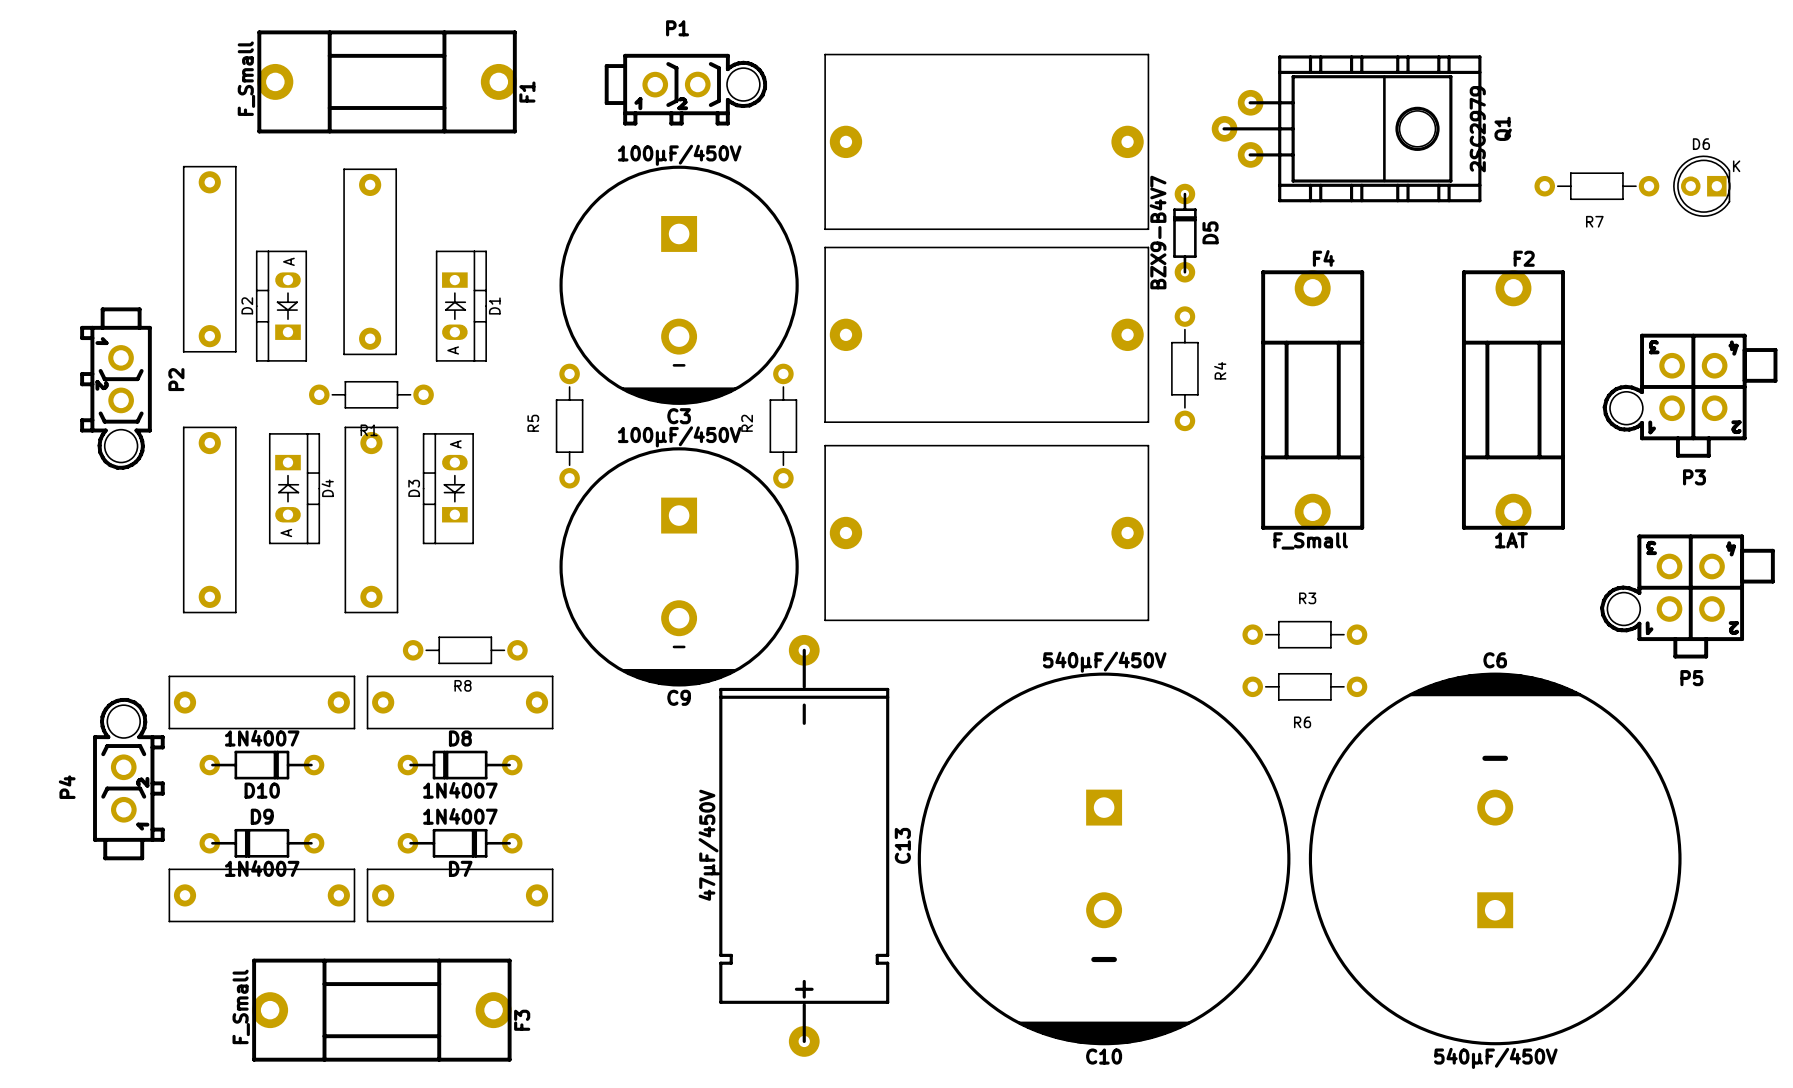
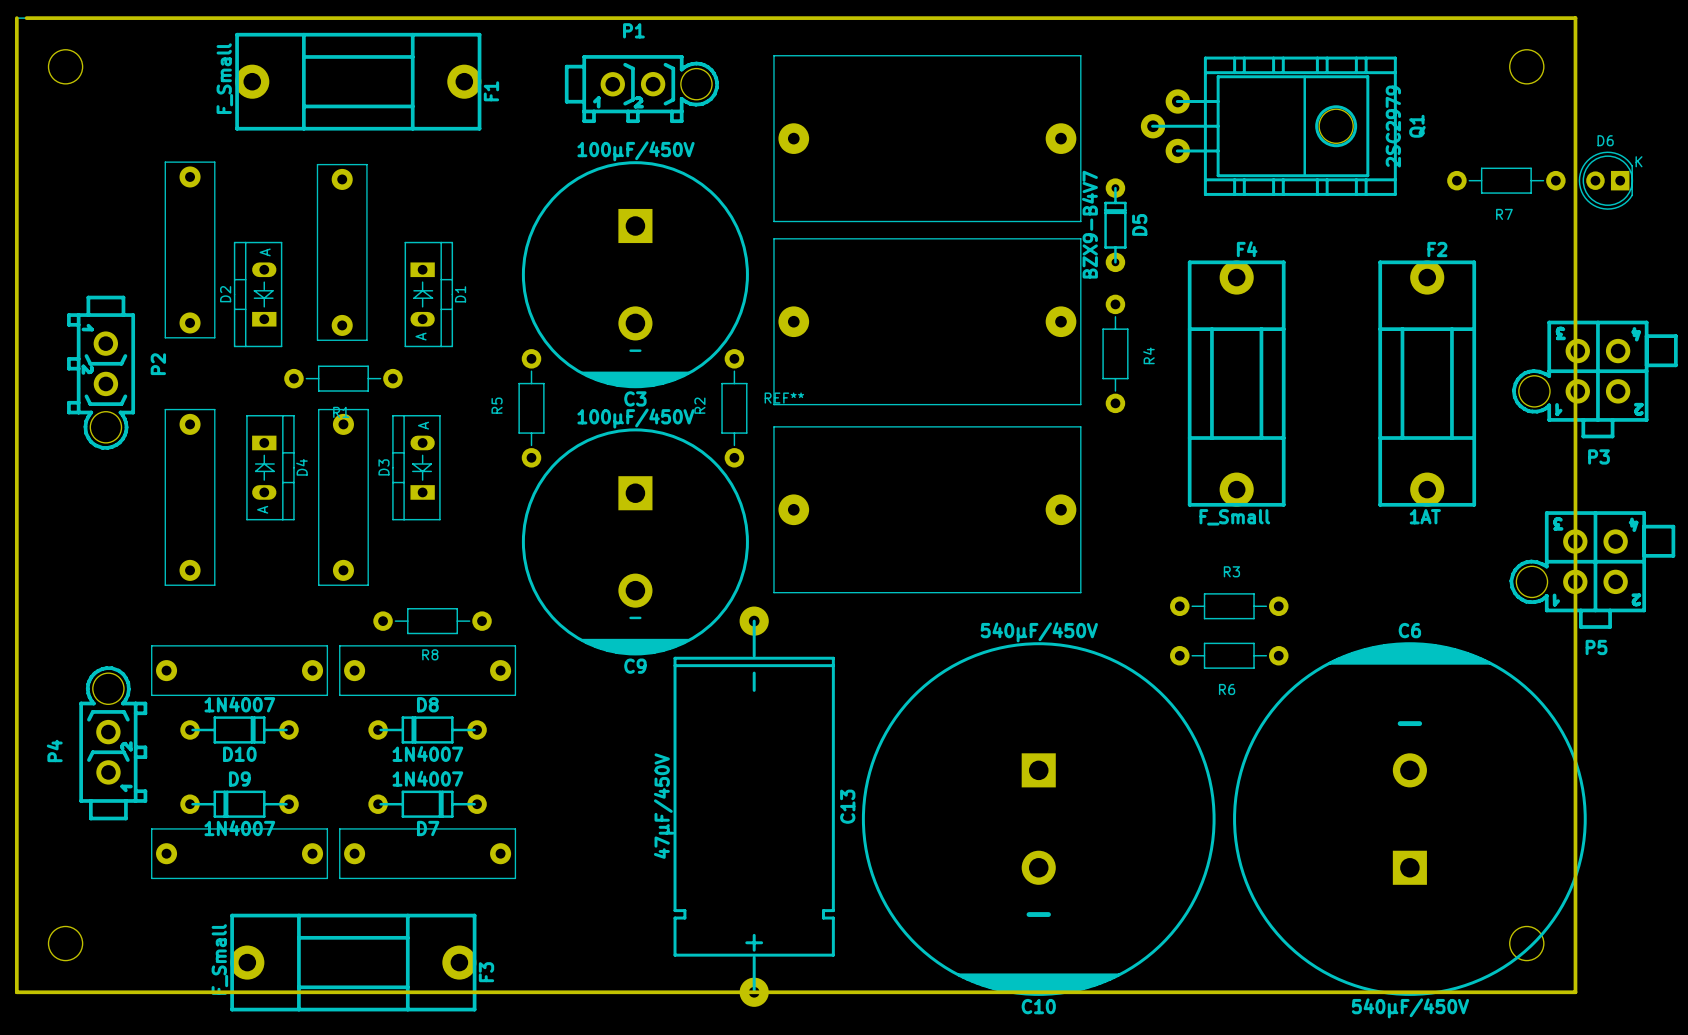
REF**: none -> (796, 505)

